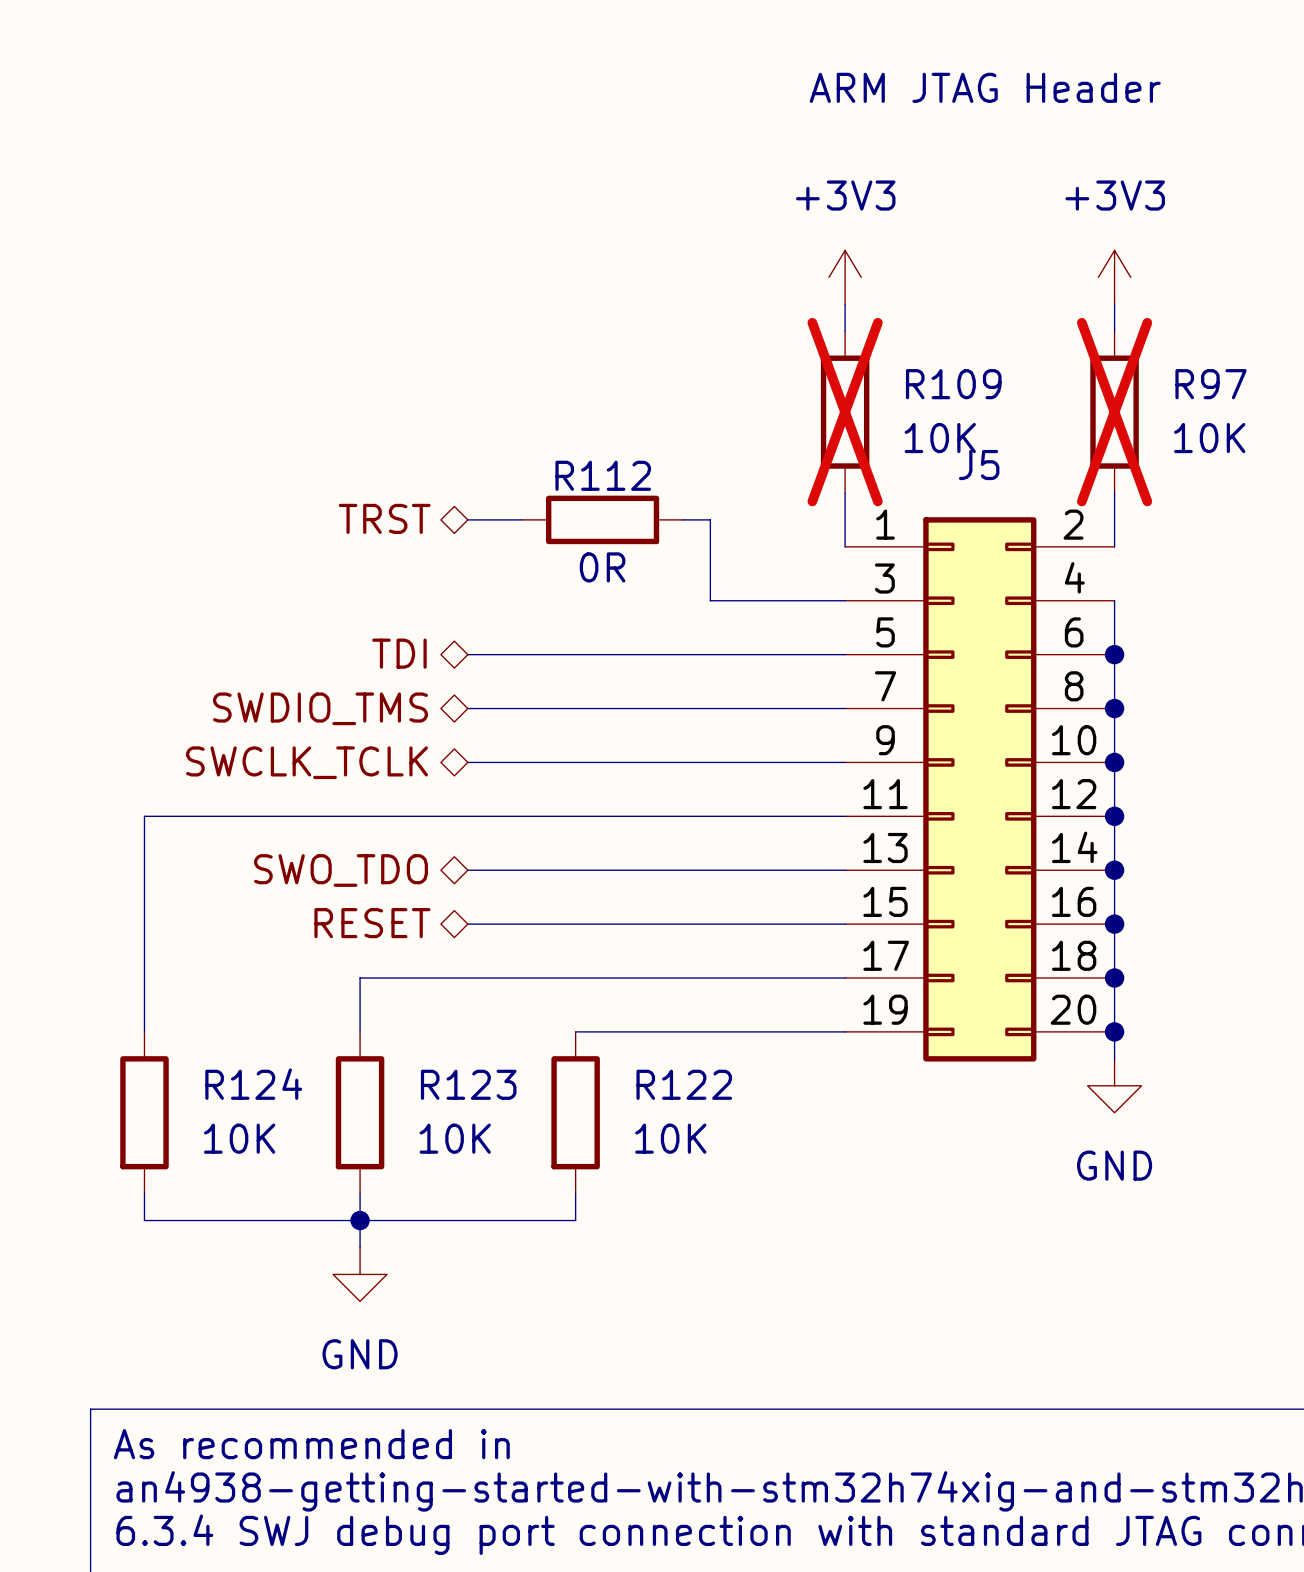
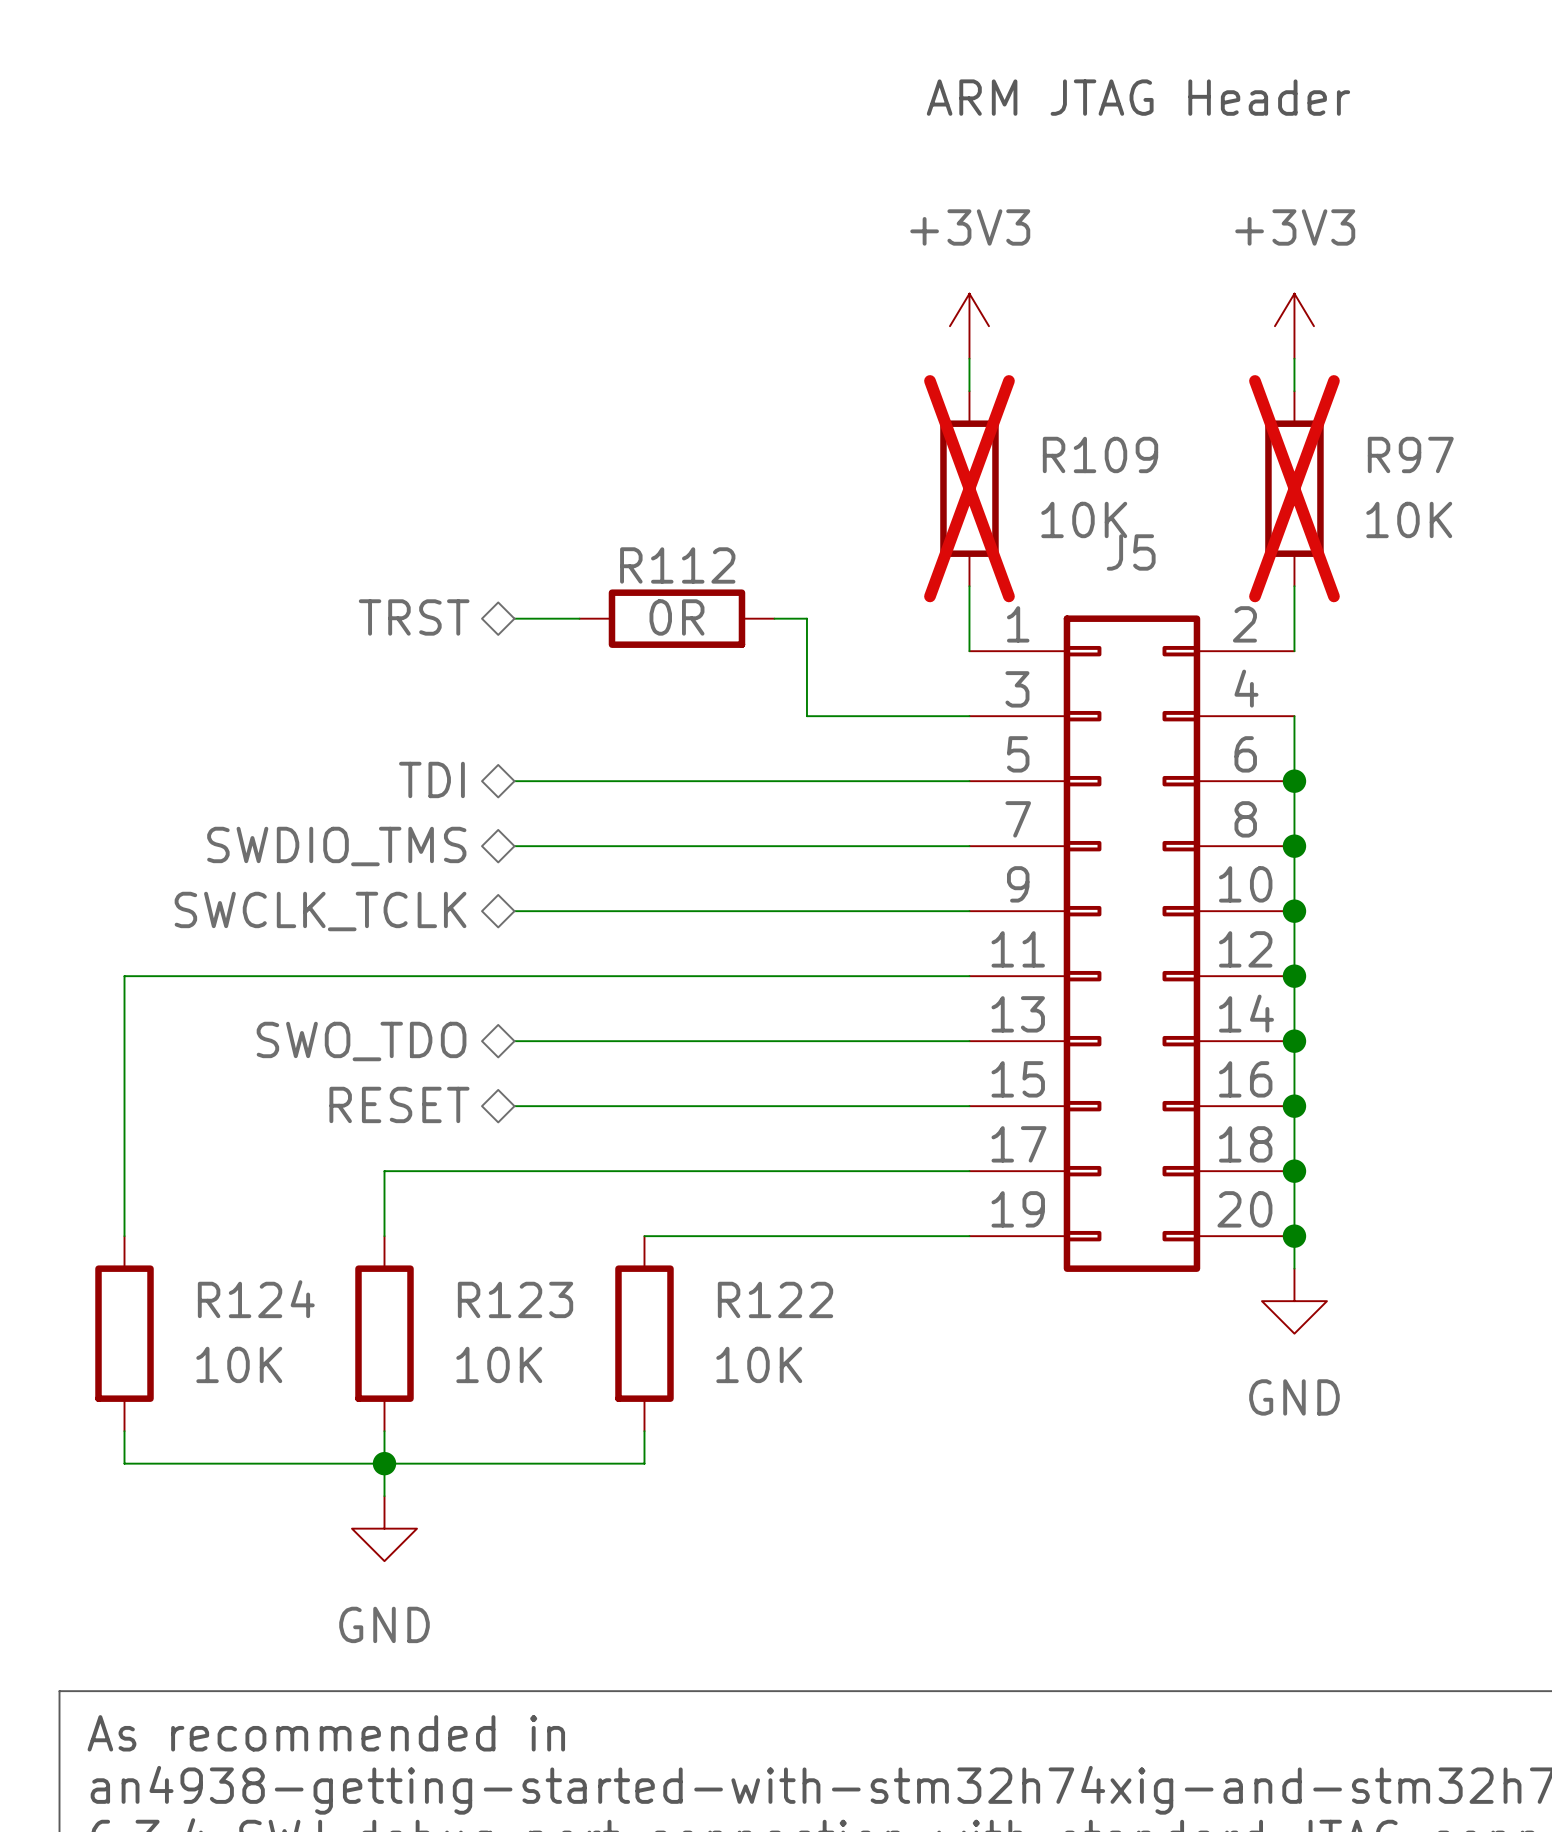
R112 value position: 0R (602, 567) -> 0R (676, 617)

